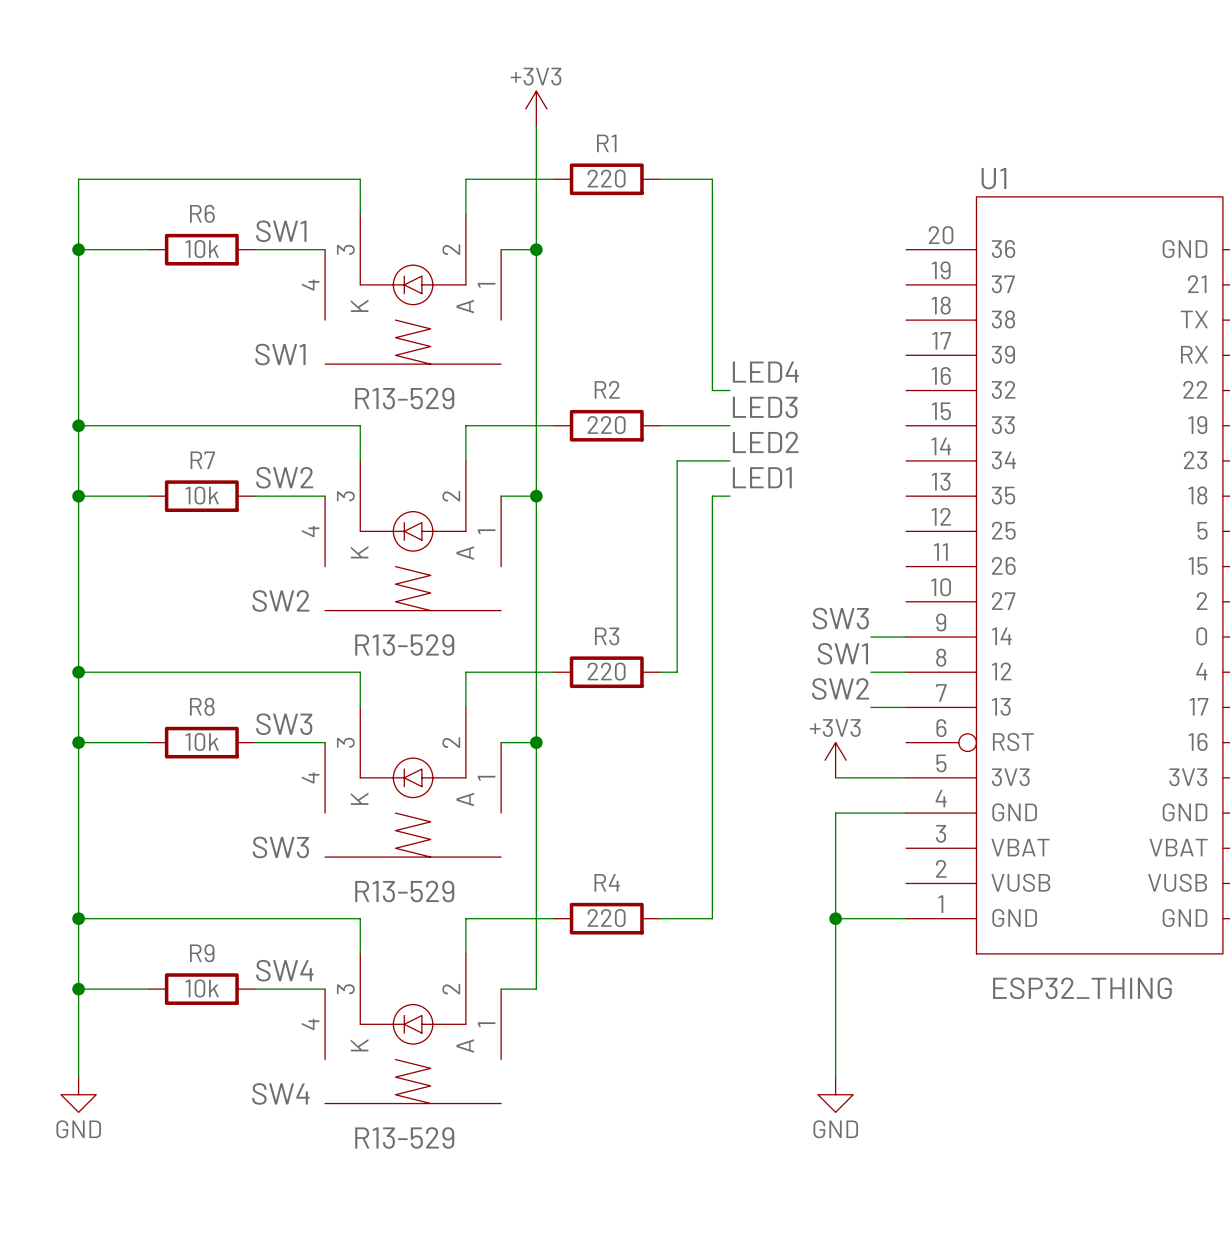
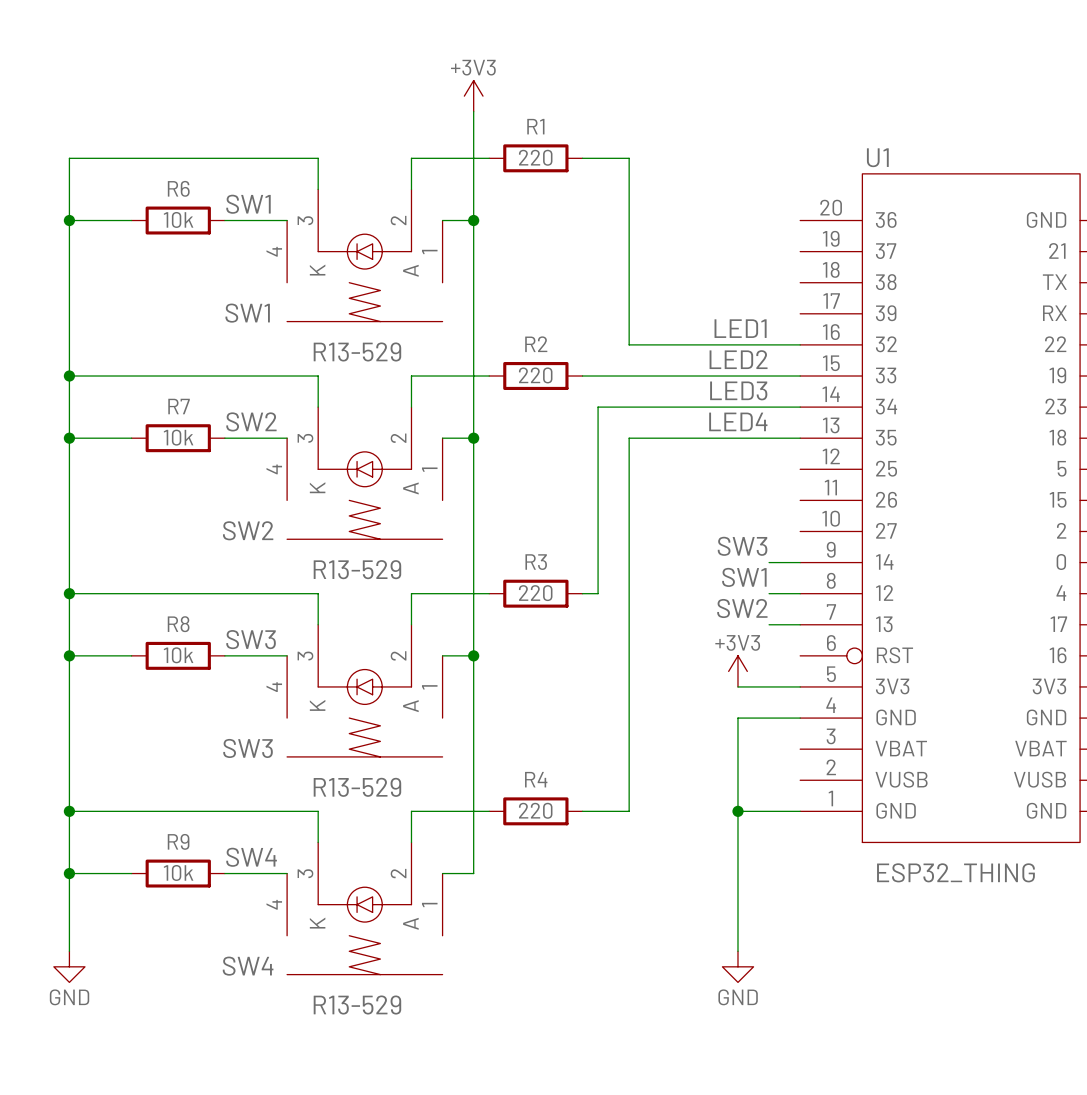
label position: LED4 (765, 372) -> LED4 (738, 421)
wire: none -> (644, 344) (800, 344)
label position: LED3 (765, 407) -> LED3 (738, 390)
wire: none -> (644, 376) (800, 376)
label position: LED2 (765, 442) -> LED2 (738, 359)
wire: none -> (644, 407) (800, 407)
label position: LED1 (762, 477) -> LED1 (740, 328)
wire: none -> (644, 438) (800, 438)

